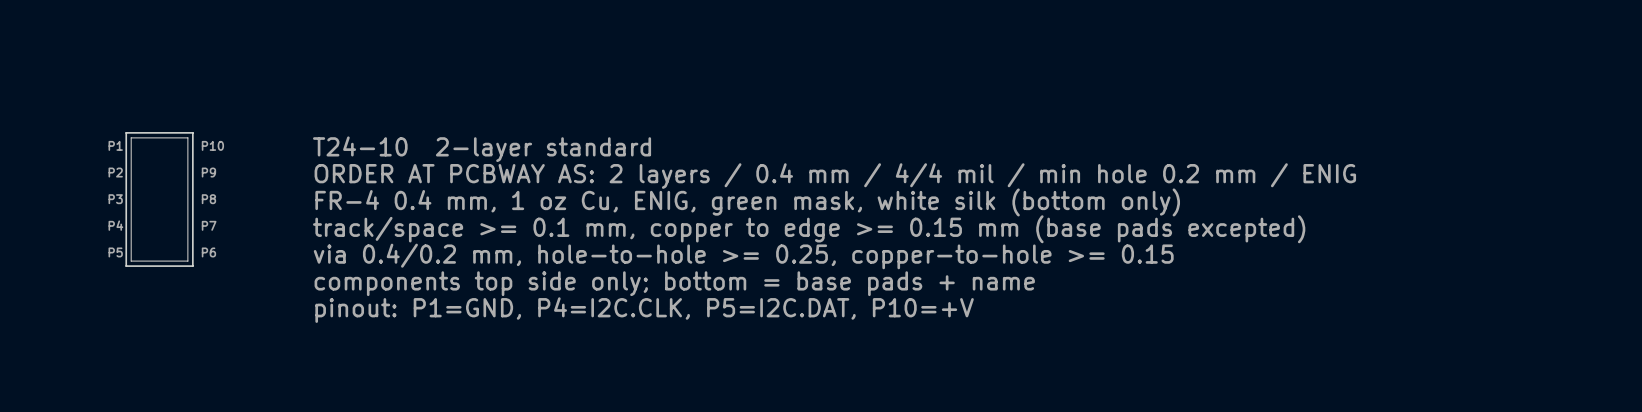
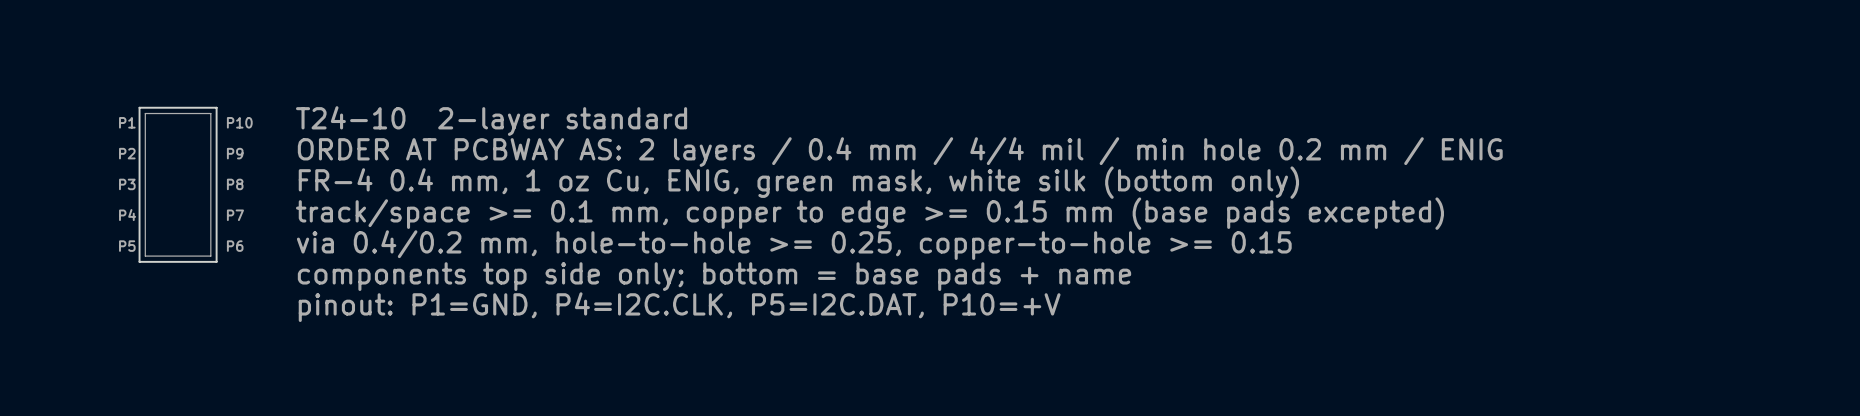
text position: T24-10 2-layer standard (482, 149) -> T24-10 2-layer standard (491, 121)
text position: ORDER AT PCBWAY AS: 2 layers / 0.4 mm / 4/4 mil / min hole 0.2 mm / ENIG (835, 176) -> ORDER AT PCBWAY AS: 2 layers / 0.4 mm / 4/4 mil / min hole 0.2 mm / ENIG (900, 152)
text position: FR-4 0.4 mm, 1 oz Cu, ENIG, green mask, white silk (bottom only) (747, 202) -> FR-4 0.4 mm, 1 oz Cu, ENIG, green mask, white silk (bottom only) (798, 182)
text position: track/space >= 0.1 mm, copper to edge >= 0.15 mm (base pads excepted) (809, 229) -> track/space >= 0.1 mm, copper to edge >= 0.15 mm (base pads excepted) (869, 213)
text position: via 0.4/0.2 mm, hole-to-hole >= 0.25, copper-to-hole >= 0.15 (743, 256) -> via 0.4/0.2 mm, hole-to-hole >= 0.25, copper-to-hole >= 0.15 (794, 245)
text position: components top side only; bottom = base pads + name (674, 283) -> components top side only; bottom = base pads + name (714, 276)
text position: pinout: P1=GND, P4=I2C.CLK, P5=I2C.DAT, P10=+V (644, 310) -> pinout: P1=GND, P4=I2C.CLK, P5=I2C.DAT, P10=+V (679, 307)

